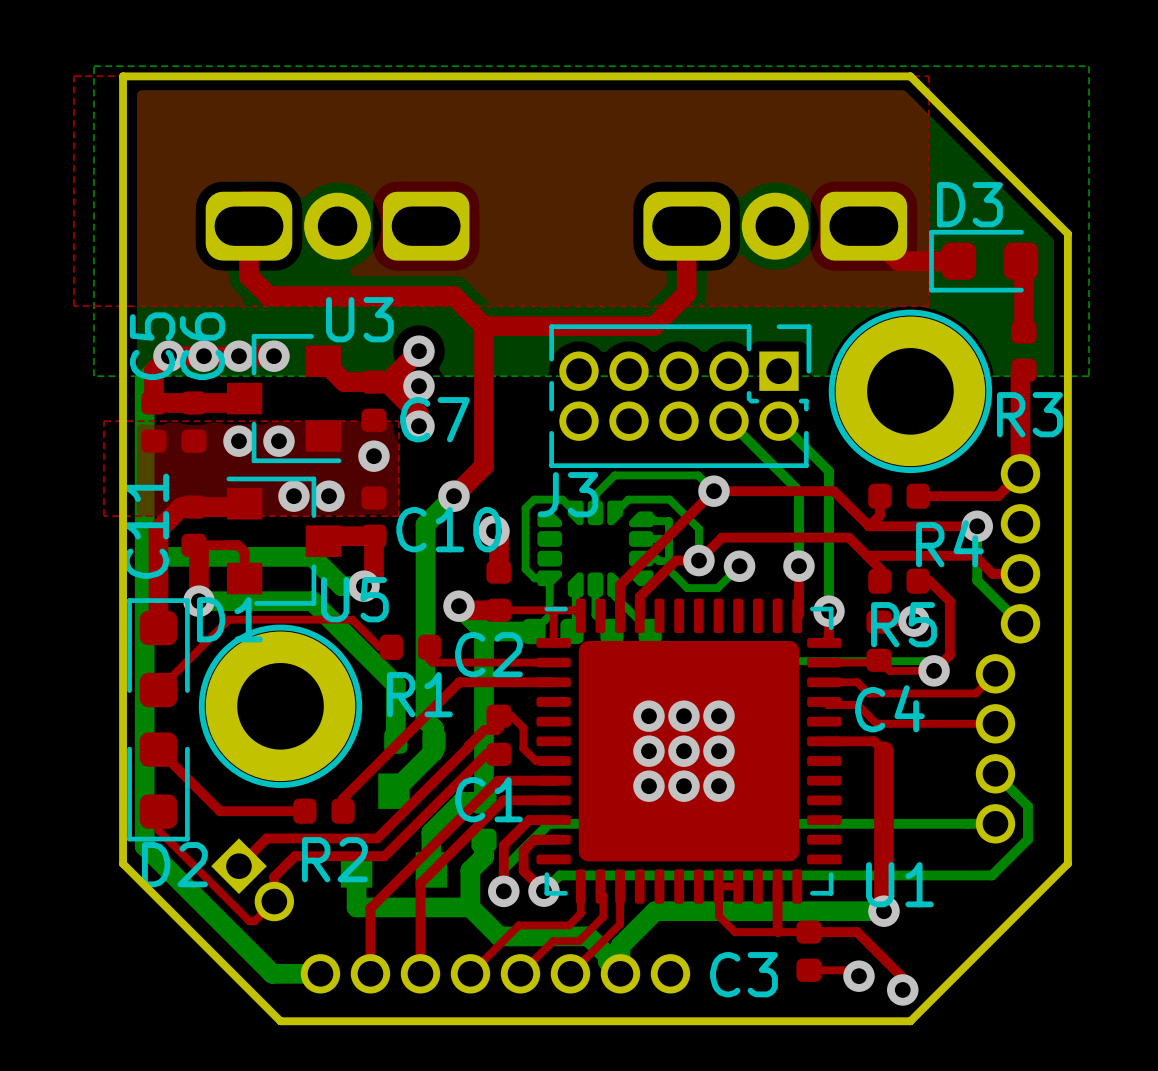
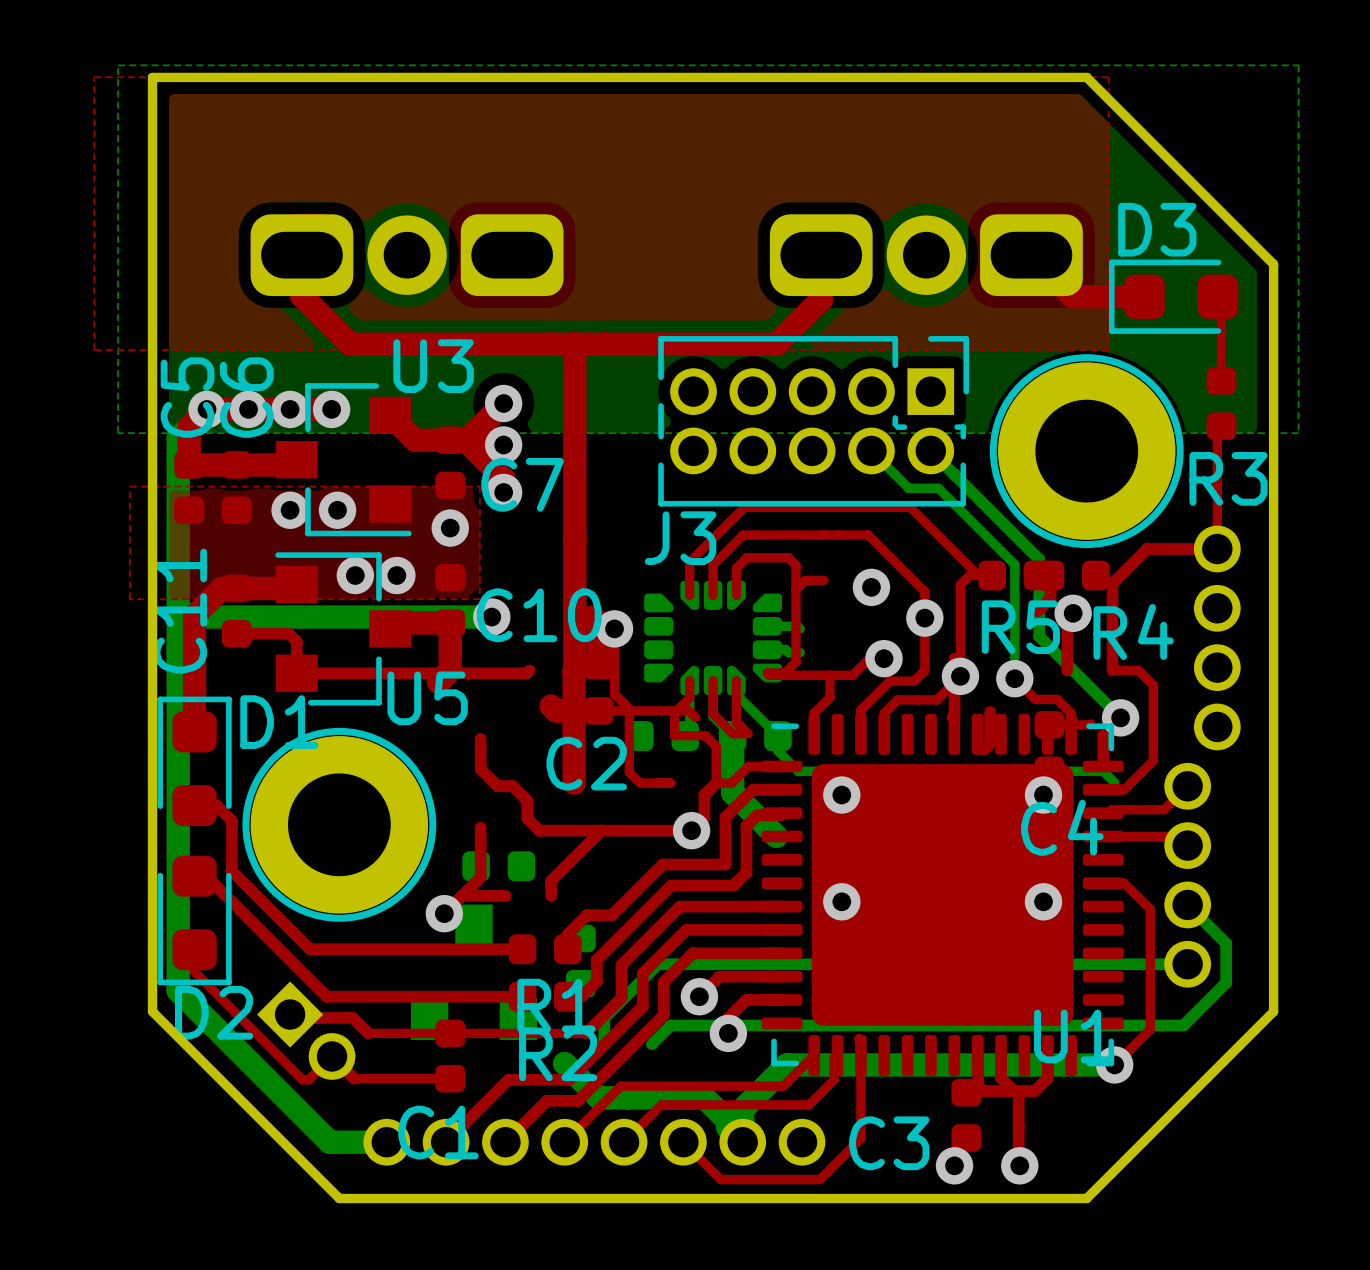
top track: (248, 260) (248, 276) (268, 296) (453, 296) (483, 326) -> (301, 296) (350, 344) (776, 344) (821, 299)
top track width: thick (1020, 261) (1023, 264) (1023, 332) -> thin (1217, 296) (1221, 300) (1221, 380)
top track: (686, 263) (686, 293) (653, 326) (483, 326) -> none
top track: none -> (574, 344) (574, 783)
top track: (483, 326) (483, 466) (453, 496) -> none
top track width: thick (1023, 370) (1020, 373) (1020, 473) -> thin (1221, 426) (1217, 430) (1217, 548)
bottom track: none -> (871, 450) (908, 488) (938, 488) (1014, 564) (1014, 678)
bottom track: none -> (930, 450) (1039, 559) (1039, 636) (1120, 717)
J3 position: (680, 396) -> (813, 421)
bottom track: (728, 421) (798, 491) (798, 566) -> none
bottom track: (778, 421) (828, 471) (828, 611) -> none
top track: (1020, 473) (998, 496) (925, 496) -> (1217, 548) (1147, 548) (1112, 583) (1112, 670) (1138, 670) (1153, 685) (1153, 760) (1124, 789) (1103, 789)
bottom track: (713, 491) (698, 475) (614, 475) (595, 494) (595, 512) -> none
via position: (713, 491) -> (871, 587)
bottom track: (453, 496) (425, 524) (425, 720) (433, 728) (433, 751) (393, 791) -> none
via: (453, 496) -> none
top track: none -> (978, 575) (910, 507) (744, 507) (689, 562) (689, 595)
top track: none -> (992, 575) (969, 575) (960, 584) (960, 676) (936, 699) (897, 699) (884, 713) (884, 734)
top track: none -> (824, 580) (805, 580) (795, 589)
bottom track: (575, 512) (562, 499) (534, 499) (525, 508) (525, 569) (534, 578) (549, 578) (549, 615) (533, 631) (484, 631) (458, 606) -> none
top track: none -> (713, 595) (713, 565) (743, 535) (868, 535) (924, 591) (924, 670) (914, 681) (889, 681) (860, 710) (860, 734)
top track: none -> (736, 595) (736, 568) (746, 557) (788, 557) (795, 565) (795, 662) (785, 673) (767, 673) (769, 675) (852, 675) (876, 651)
bottom track: (615, 512) (628, 499) (669, 499) (698, 528) (698, 560) -> none
bottom track: (641, 519) (668, 521) (668, 569) (687, 588) (717, 588) (739, 566) -> none
bottom track: none -> (178, 610) (184, 617) (491, 617)
top track: (977, 526) (869, 526) (833, 491) (713, 491) (620, 585) (620, 615) -> none
bottom track: (977, 526) (977, 580) (1020, 623) -> none
via: (977, 526) -> none
top track: none -> (1073, 613) (1067, 619) (1067, 670)
via: none -> (1073, 613)
via: none -> (491, 617)
via position: (493, 531) -> (614, 628)
via: none -> (924, 618)
top track: none -> (614, 628) (614, 694) (629, 708) (629, 772) (640, 783) (670, 783)
top track: (193, 545) (198, 550) (198, 601) -> none
top track: (867, 555) (974, 555) (992, 573) (1020, 573) -> none
bottom track: (144, 556) (312, 556) (341, 586) (363, 586) -> none
via: (698, 560) -> none
via position: (798, 566) -> (960, 676)
top track: none -> (529, 670) (526, 673) (296, 673)
top track: none -> (829, 675) (829, 697) (814, 713) (814, 734)
top track: (879, 581) (879, 568) (848, 537) (721, 537) (698, 560) (675, 560) (639, 596) (639, 615) -> none
R5 position: (898, 581) -> (1014, 575)
top track: (918, 581) (929, 581) (949, 601) (949, 655) (934, 670) (889, 670) (878, 660) (876, 662) (824, 662) -> none
top track: none -> (1014, 678) (1035, 699) (1057, 699) (1071, 713) (1071, 734)
top track: none -> (689, 680) (689, 697) (674, 713) (674, 735) (705, 735) (716, 746) (716, 783)
top track: none -> (713, 680) (713, 714) (732, 733) (747, 733) (736, 722) (736, 680)
via: (363, 586) -> none
bottom track: (198, 601) (312, 601) (395, 684) (395, 741) -> none
via: (198, 601) -> none
via: (458, 606) -> none
top track: (553, 610) (553, 643) -> none
via position: (828, 611) -> (1014, 678)
top track: none -> (1120, 717) (1103, 735) (1103, 766)
via position: (913, 621) -> (1120, 717)
bottom track: (483, 631) (483, 802) (461, 802) (431, 832) (431, 869) -> none
top track: none -> (480, 738) (480, 769) (497, 786) (512, 786) (527, 800) (527, 818) (539, 830) (691, 830) (704, 817) (704, 794) (716, 783)
top track: (391, 647) (379, 647) (352, 619) (228, 619) (158, 690) -> none
R1 position: (410, 647) -> (545, 949)
top track: (429, 647) (429, 659) (432, 662) (553, 662) -> none
top track: none -> (782, 766) (748, 766) (731, 783) (716, 783)
via: (934, 670) -> none
top track: none -> (782, 789) (753, 789) (725, 817) (724, 864) (662, 864) (611, 915) (586, 915) (567, 934) (567, 949)
via: none -> (841, 795)
via: none -> (1043, 795)
top track: (553, 682) (459, 682) (343, 798) (343, 811) -> none
top track: (824, 682) (857, 682) (868, 693) (975, 693) -> (1103, 813) (1108, 813) (1111, 809) (1164, 809)
top track: none -> (782, 813) (779, 815) (757, 815) (746, 826) (746, 872) (733, 885) (671, 885) (596, 960) (596, 981) (581, 996) (567, 996)
top track: (824, 701) (827, 704) (857, 704) (876, 723) (995, 723) -> (1103, 836) (1178, 836) (1187, 845)
top track: none -> (480, 827) (480, 877) (444, 913)
top track: none -> (601, 830) (551, 880) (551, 895)
via: none -> (691, 830)
via: (648, 716) -> none
via: (683, 716) -> none
via: (718, 716) -> none
C1 position: (498, 735) -> (450, 1056)
top track: (824, 741) (874, 741) (883, 751) (883, 911) -> none
top track: (158, 749) (220, 811) (255, 811) -> (194, 805) (216, 805) (231, 820) (231, 871) (309, 949)
top track: none -> (194, 876) (206, 876) (326, 996) (522, 996)
via: (648, 751) -> none
via: (683, 751) -> none
U1 position: (688, 751) -> (942, 894)
via: (718, 751) -> none
top track: (498, 754) (486, 754) (384, 856) (294, 856) (274, 876) (274, 901) -> (450, 1078) (354, 1078) (332, 1056)
top track: none -> (1103, 883) (1124, 883) (1150, 909) (1150, 1029) (1114, 1064)
top track: (553, 761) (535, 761) (523, 748) (523, 727) (511, 716) (498, 716) (498, 727) (496, 729) (484, 729) (377, 838) (266, 838) (238, 866) -> (782, 906) (680, 906) (621, 964) (621, 997) (586, 1033) (368, 1033) (352, 1017) (317, 1017) (313, 1014) (290, 1014)
top track: none -> (462, 895) (505, 895)
via: none -> (841, 901)
via: none -> (1043, 901)
top track: (553, 780) (498, 780) (370, 908) (370, 973) -> (782, 929) (686, 929) (642, 973) (642, 1006) (569, 1079) (508, 1079) (446, 1142)
via: none -> (444, 913)
via: (648, 786) -> none
via: (683, 786) -> none
via: (718, 786) -> none
top track: (553, 800) (503, 800) (420, 883) (420, 973) -> (782, 953) (692, 953) (663, 982) (663, 1015) (578, 1100) (546, 1100) (505, 1142)
top track: none -> (368, 949) (522, 949)
R2 position: (323, 811) -> (545, 996)
top track: (553, 820) (529, 820) (503, 845) (503, 891) -> none
top track: none -> (782, 976) (719, 976) (699, 996)
top track: (553, 839) (534, 839) (523, 850) (523, 870) (543, 891) -> none
bottom track: (483, 840) (483, 856) (470, 870) (470, 907) (356, 907) (356, 869) -> none
via: none -> (699, 996)
top track: none -> (782, 999) (746, 999) (728, 1017) (728, 1033)
via: none -> (728, 1033)
top track: (580, 886) (580, 913) (568, 925) (517, 926) -> (814, 1055) (783, 1086) (620, 1086)
top track: (600, 886) (600, 892) (603, 895) (603, 916) (578, 941) (551, 942) -> (837, 1055) (834, 1057) (834, 1079) (809, 1104) (661, 1104)
top track: (620, 886) (620, 924) (570, 973) -> (860, 1055) (860, 1138) (819, 1179) (720, 1179) (683, 1142)
top track: (718, 886) (738, 886) -> none
top track: (777, 886) (777, 931) -> none
top track: (718, 887) (718, 916) (734, 932) (857, 932) (902, 977) (902, 989) -> none
via: (503, 891) -> none
via: (543, 891) -> none
top track: none -> (1001, 1055) (1001, 1078) (1018, 1095) (1019, 1165)
top track: none -> (1047, 1055) (1047, 1078) (1034, 1091) (983, 1091) (978, 1085) (978, 1057)
via: none -> (1114, 1064)
bottom track: (655, 911) (883, 911) -> (784, 1067) (786, 1064) (1114, 1064)
via: (883, 911) -> none
top track: (808, 970) (853, 970) (858, 976) -> none
via position: (858, 976) -> (1019, 1165)
via: (902, 989) -> none
via: none -> (954, 1165)

